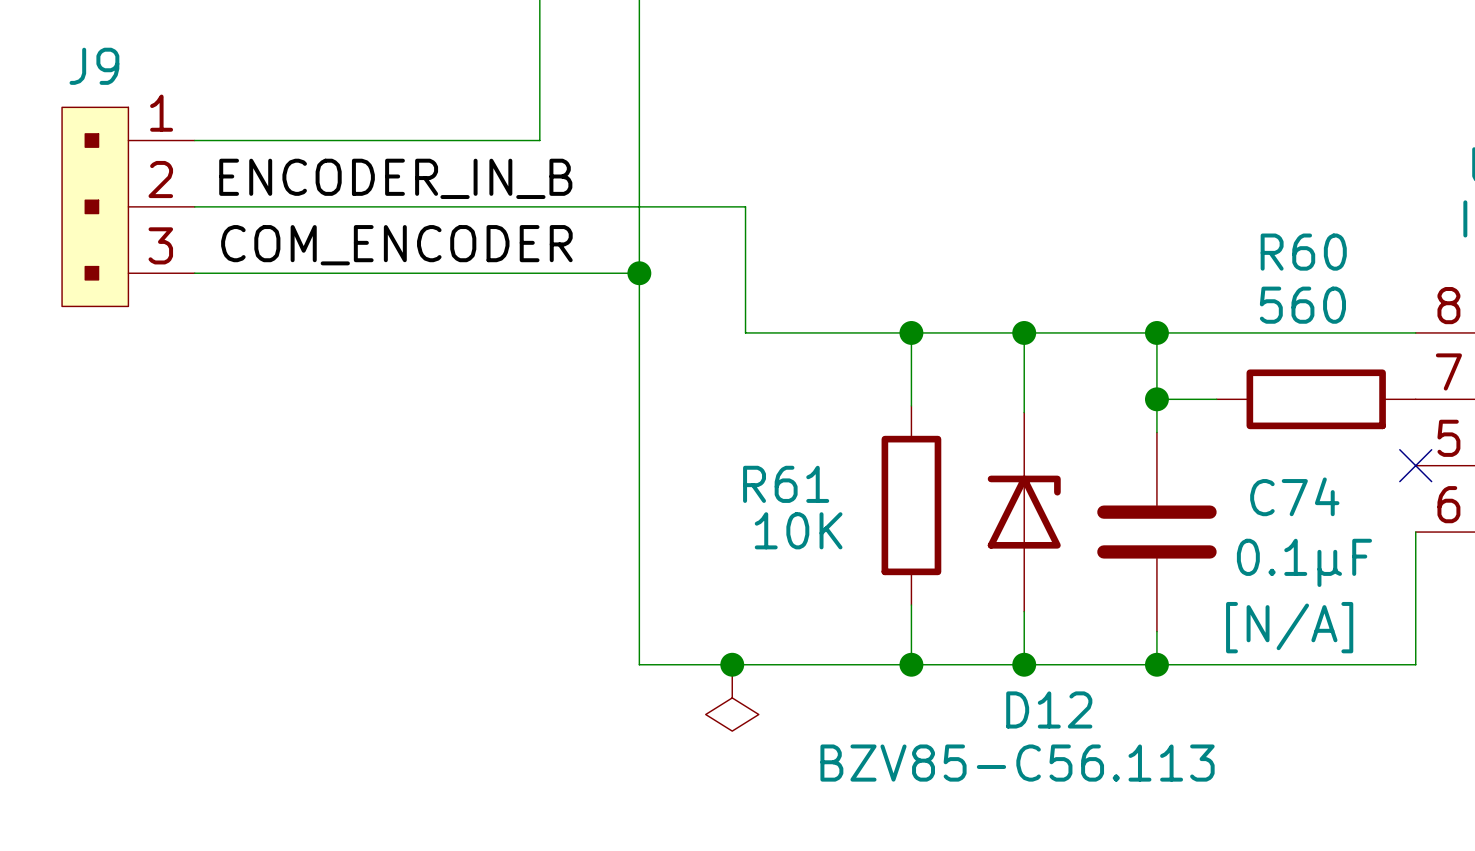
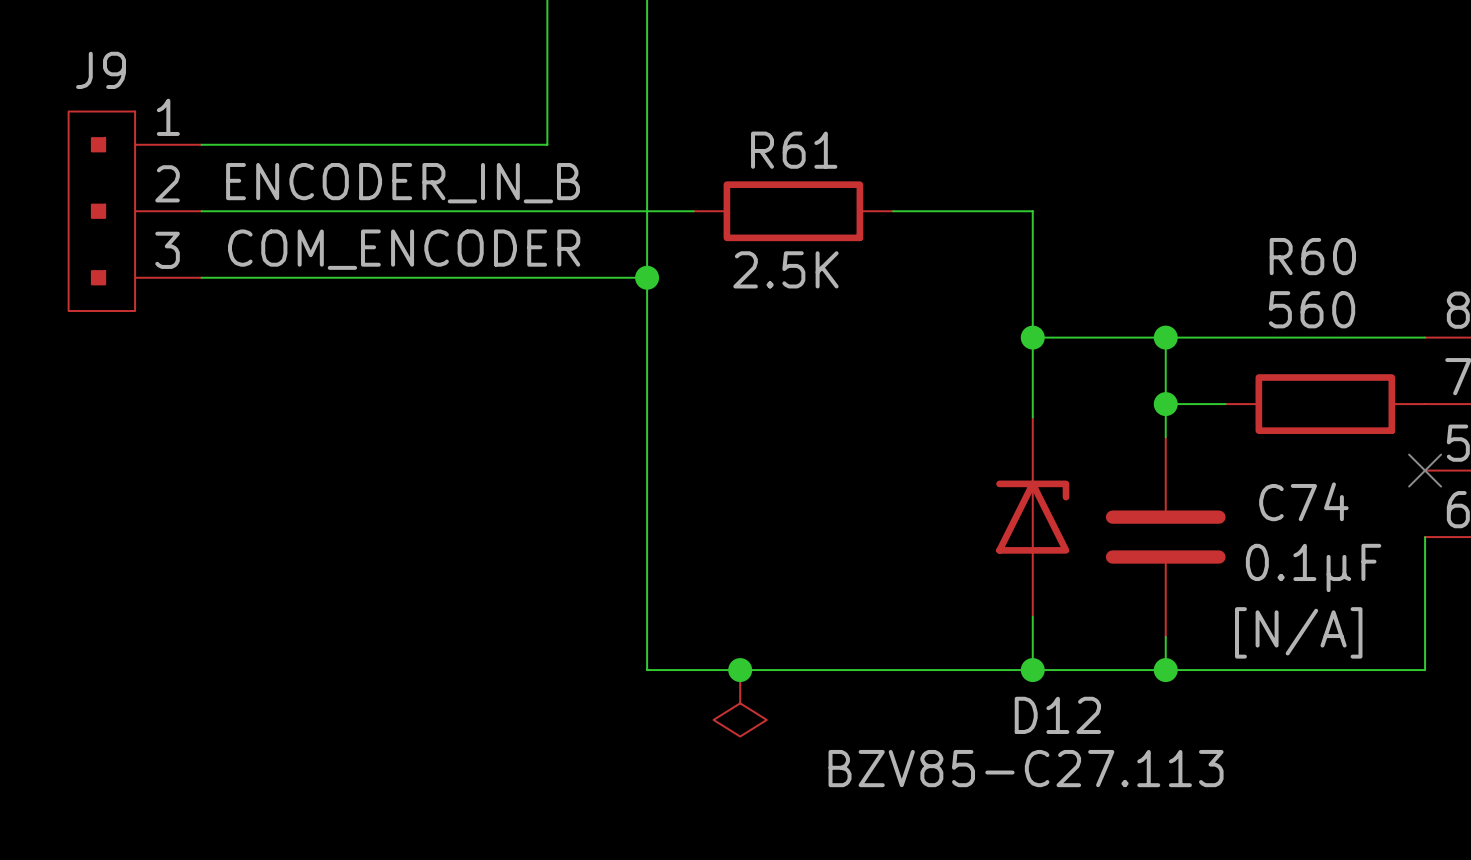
wire: (685, 206) (745, 206) (745, 332) (1024, 332) -> (893, 211) (1032, 211) (1032, 337)
wire: (911, 332) (911, 405) -> none
junction: (911, 332) -> none
R61 name position: R61 (786, 484) -> R61 (794, 150)
R61 rotation: 0° (911, 505) -> 90° clockwise (793, 211)
R61 position: (911, 505) -> (793, 211)
R61 value: 10K (798, 530) -> 2.5K (785, 269)
wire: (911, 605) (911, 664) -> none
junction: (911, 664) -> none
D12 value: BZV85-C56.113 (1017, 763) -> BZV85-C27.113 (1026, 768)

